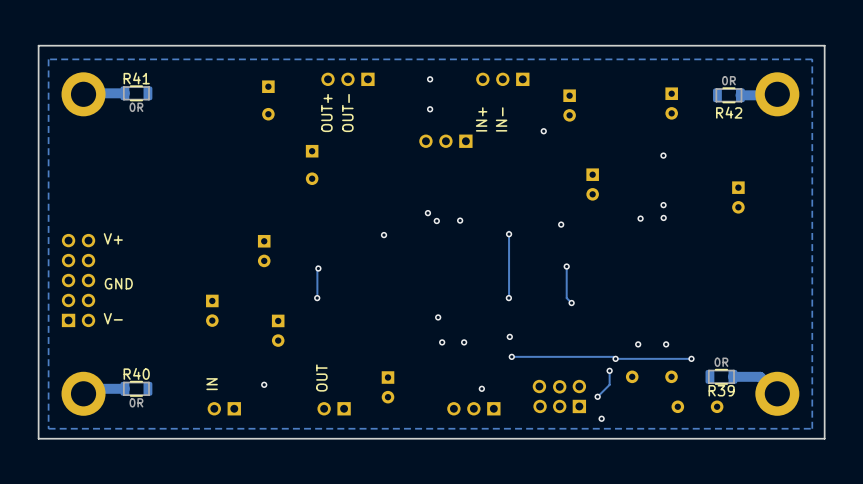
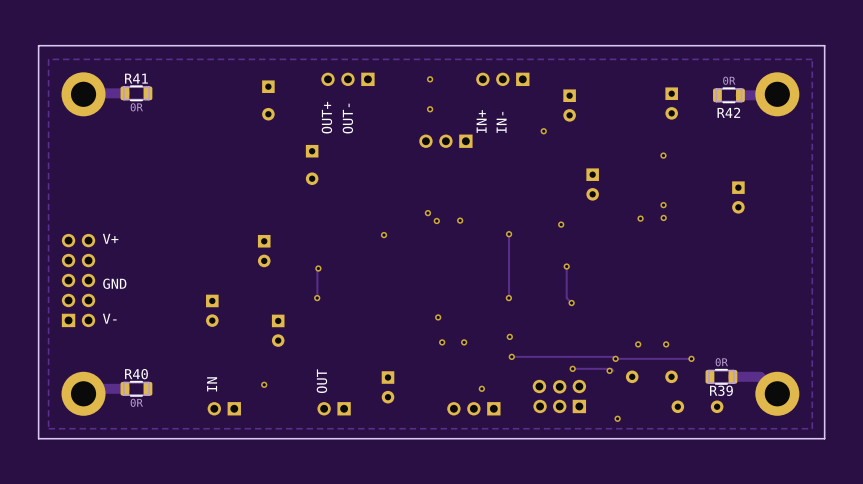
track: none -> (572, 368) (611, 368) (613, 370)
via: none -> (572, 368)
track: (609, 370) (609, 384) (597, 396) -> none
via: (597, 396) -> none
via: (601, 418) -> none
via: none -> (617, 418)

